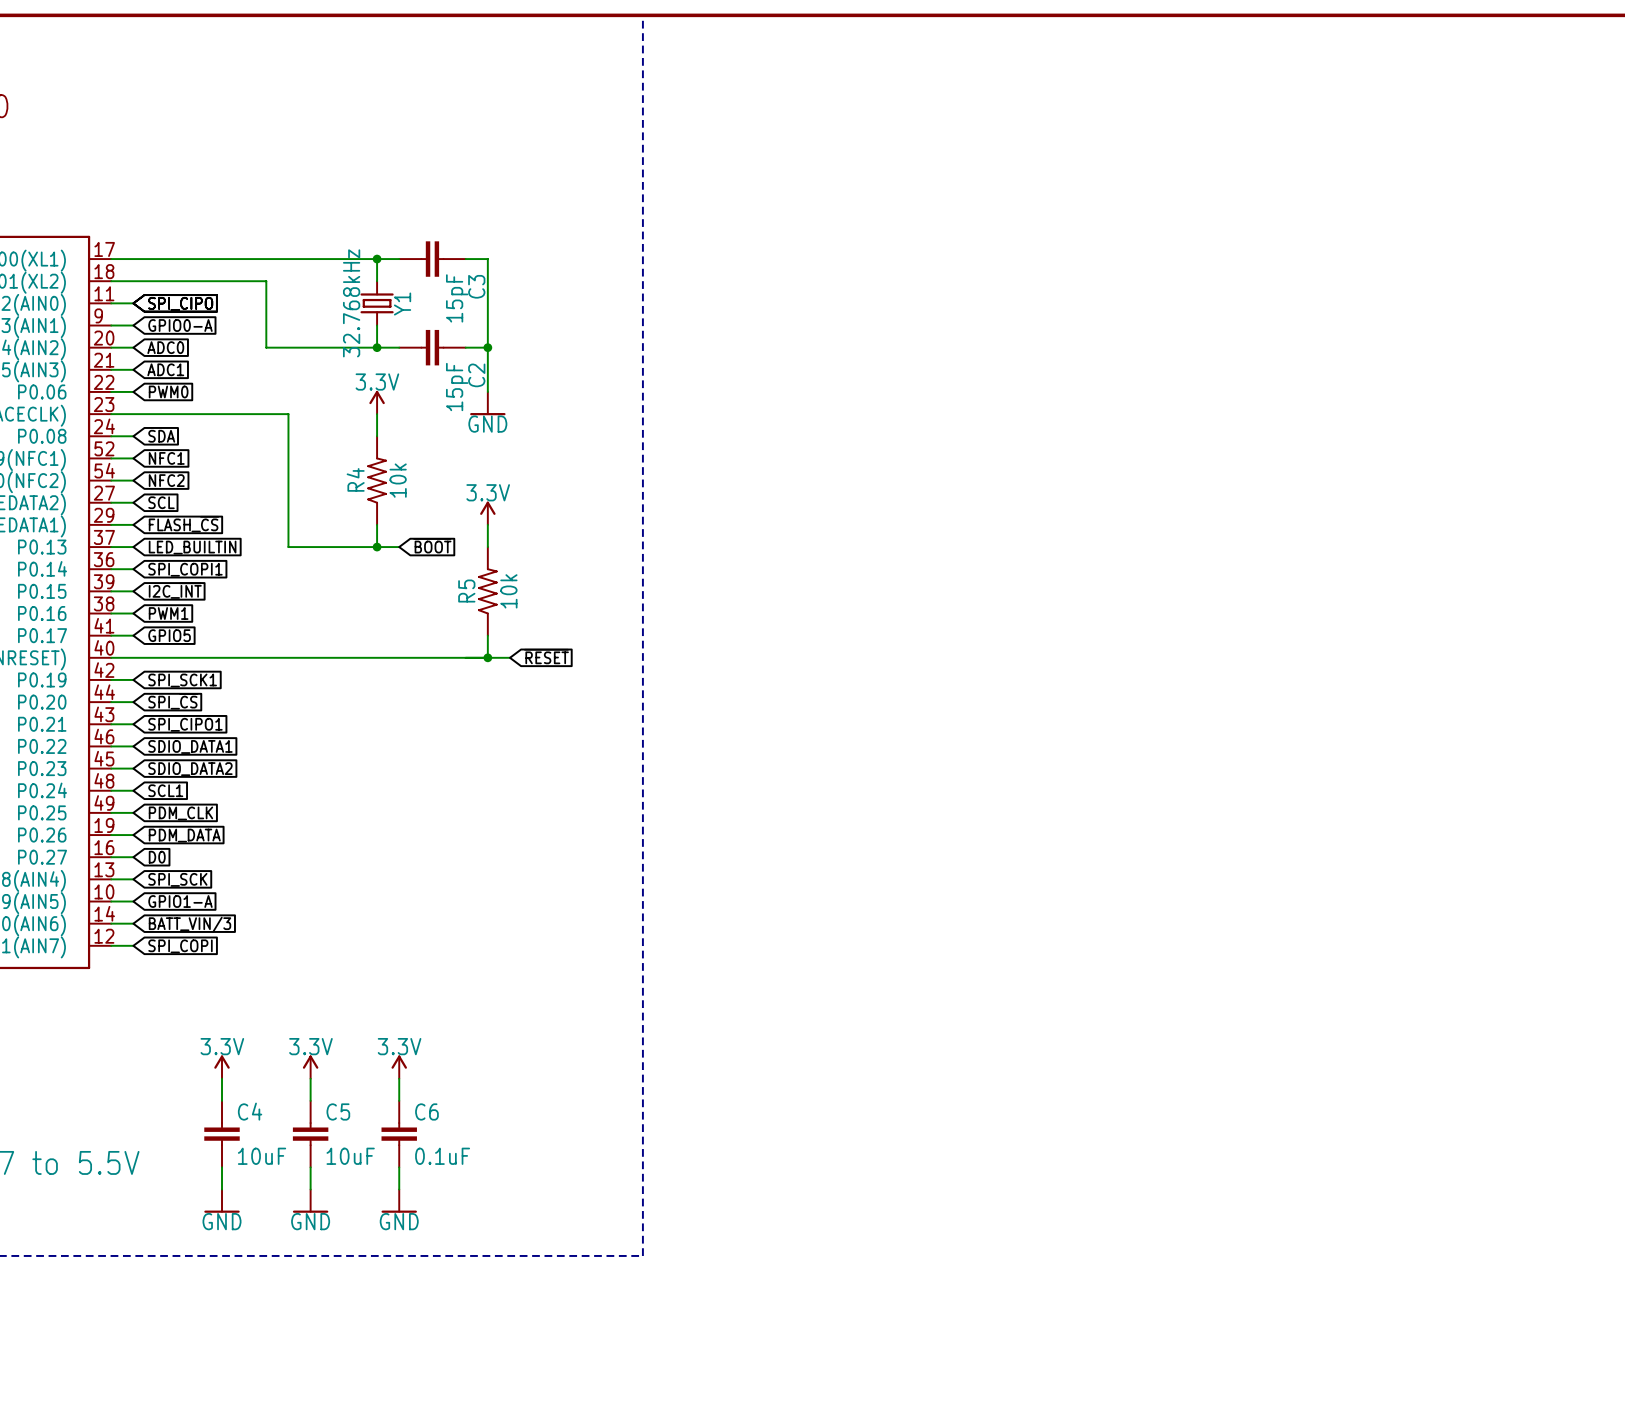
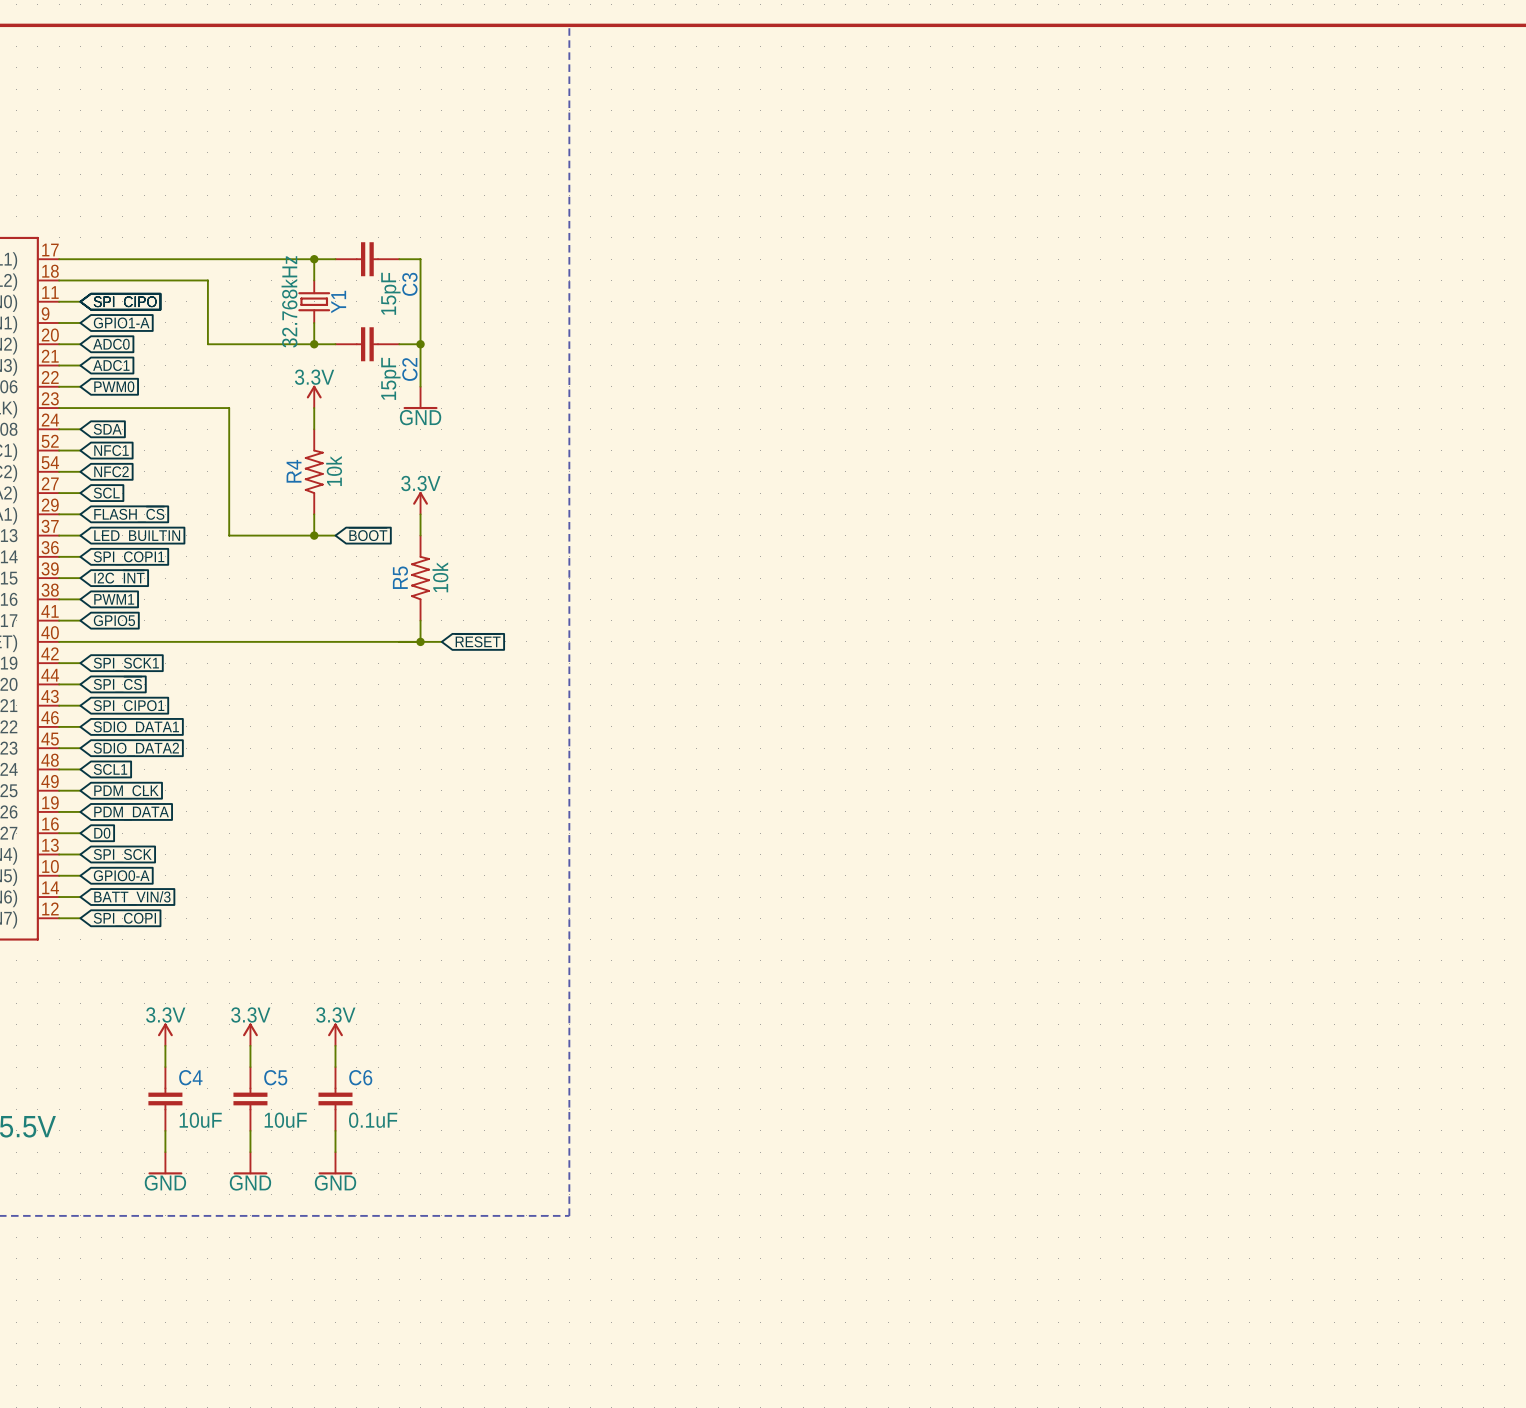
global label: GPIO0-A (180, 325) -> GPIO1-A (121, 322)
global label: GPIO1-A (180, 901) -> GPIO0-A (121, 875)

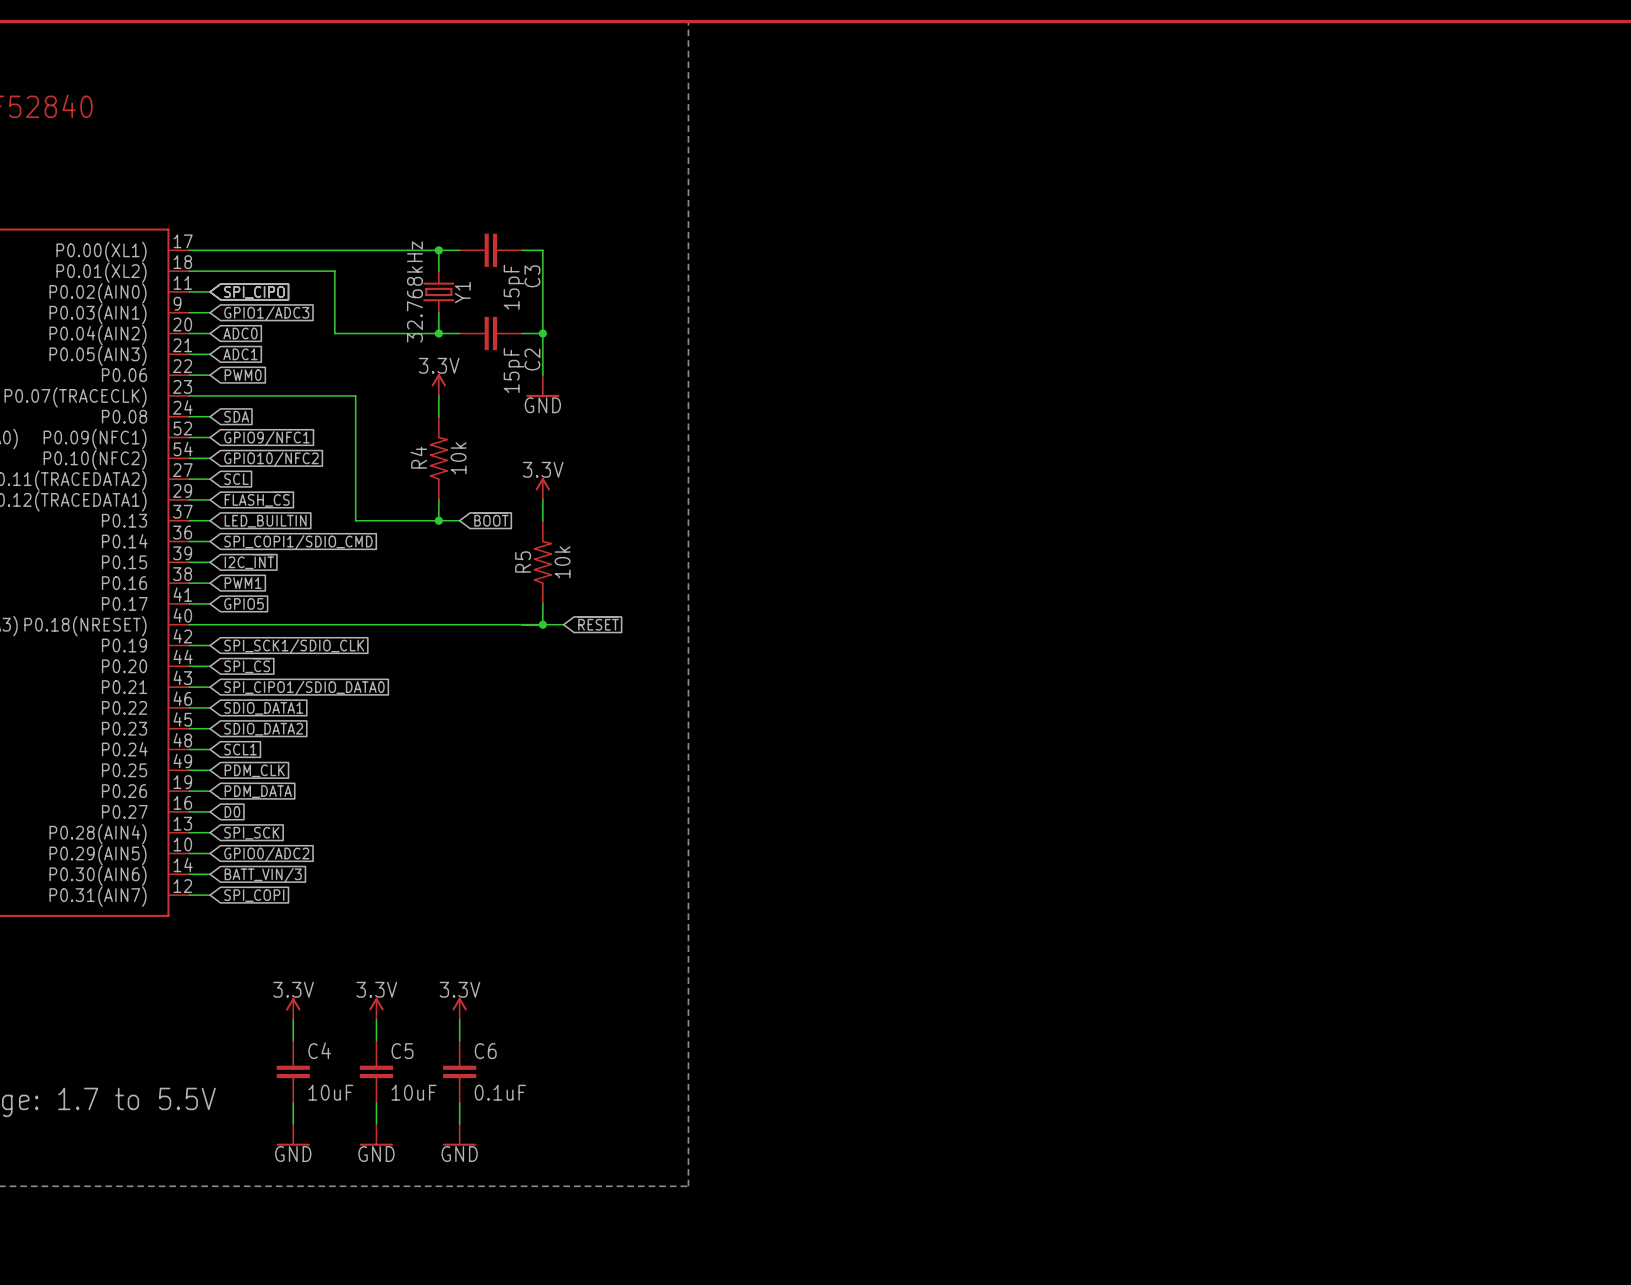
global label: GPIO1-A (121, 322) -> GPIO1/ADC3 (266, 313)
global label: NFC1 (111, 450) -> GPIO9/NFC1 (267, 438)
global label: NFC2 (111, 471) -> GPIO10/NFC2 (271, 459)
global label: SPI_COPI1 (129, 558) -> SPI_COPI1/SDIO_CMD (298, 542)
global label: SPI_SCK1 (126, 664) -> SPI_SCK1/SDIO_CLK (294, 646)
global label: SPI_CIPO1 (129, 707) -> SPI_CIPO1/SDIO_DATA0 (304, 688)
global label: GPIO0-A (121, 875) -> GPIO0/ADC2 (266, 854)

